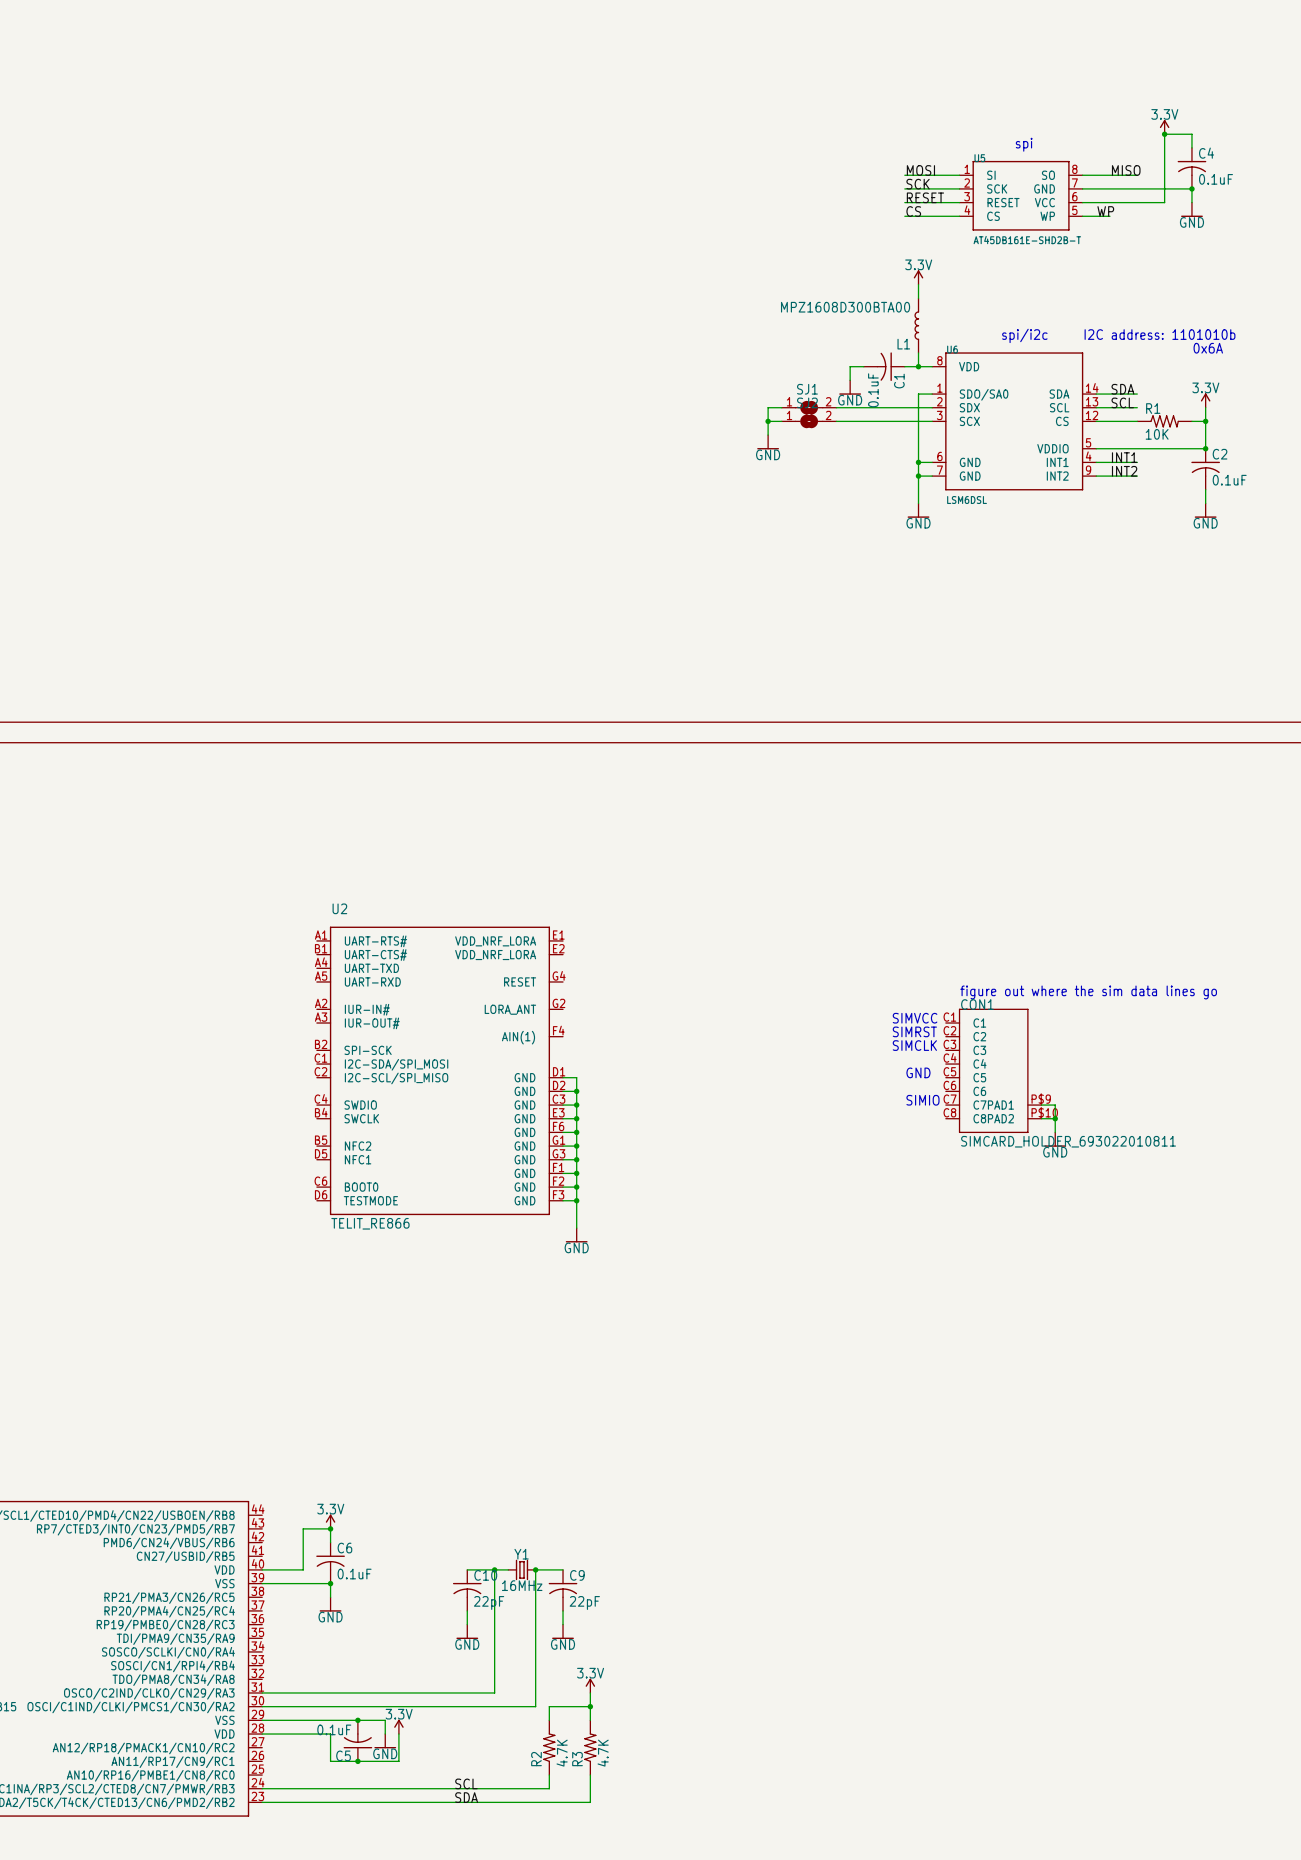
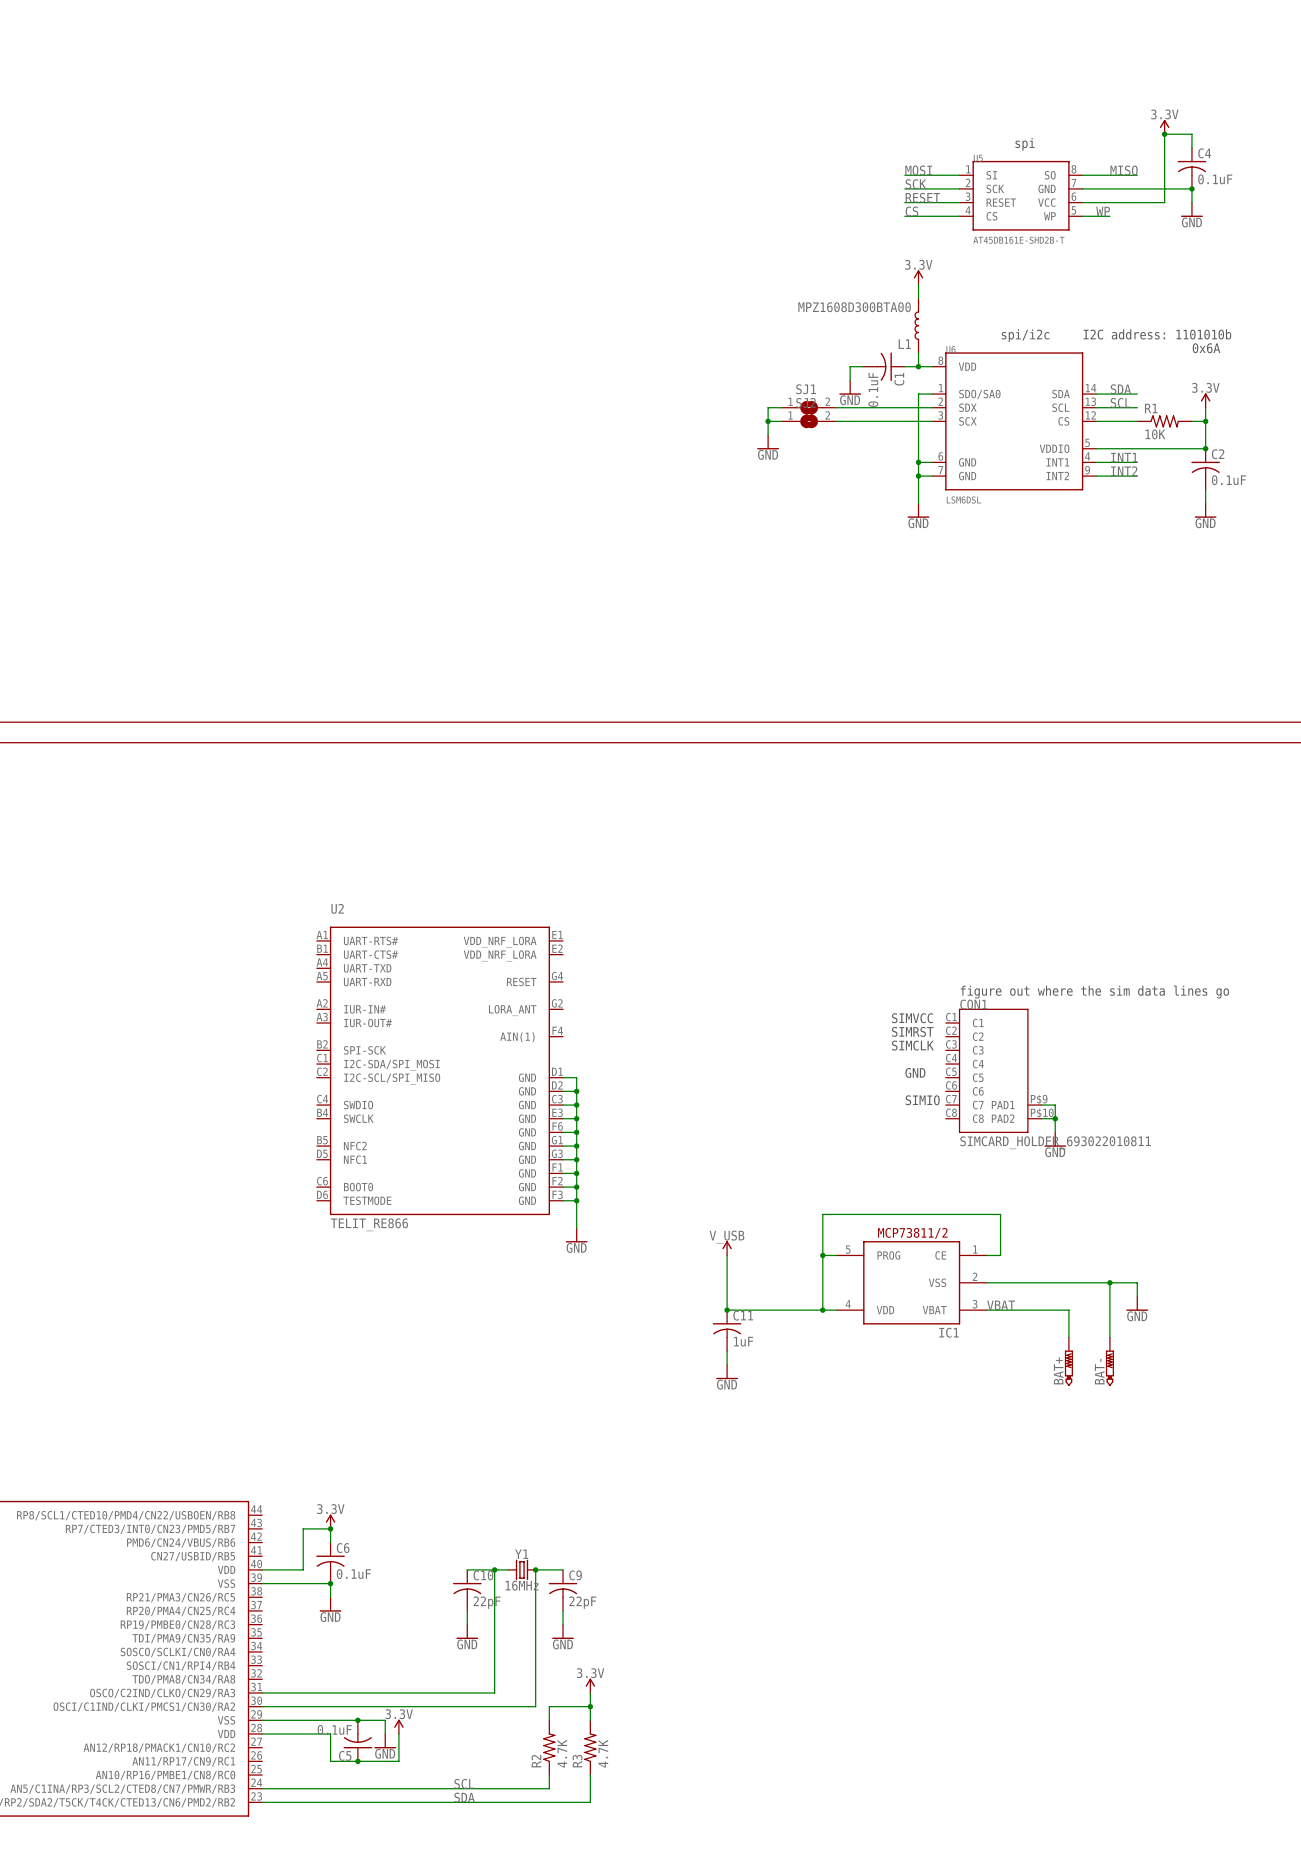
power symbol: none -> V_USB (727, 1248)
wire: none -> (727, 1255) (727, 1310) (836, 1310)
wire: none -> (822, 1255) (836, 1255)
junction: none -> (822, 1255)
wire: none -> (986, 1255) (1000, 1255) (1000, 1214) (822, 1214) (822, 1310)
IC1: none -> (911, 1282)
wire: none -> (986, 1282) (1137, 1282) (1137, 1296)
wire: none -> (1109, 1282) (1109, 1337)
junction: none -> (1109, 1282)
power symbol: none -> GND (1137, 1303)
label: none -> VBAT (1001, 1305)
junction: none -> (727, 1310)
junction: none -> (822, 1310)
wire: none -> (986, 1310) (1068, 1310) (1068, 1337)
C11: none -> 1uF (727, 1330)
wire: none -> (727, 1351) (727, 1364)
BAT+: none -> (1068, 1361)
BAT-: none -> (1109, 1361)
power symbol: none -> GND (727, 1372)

